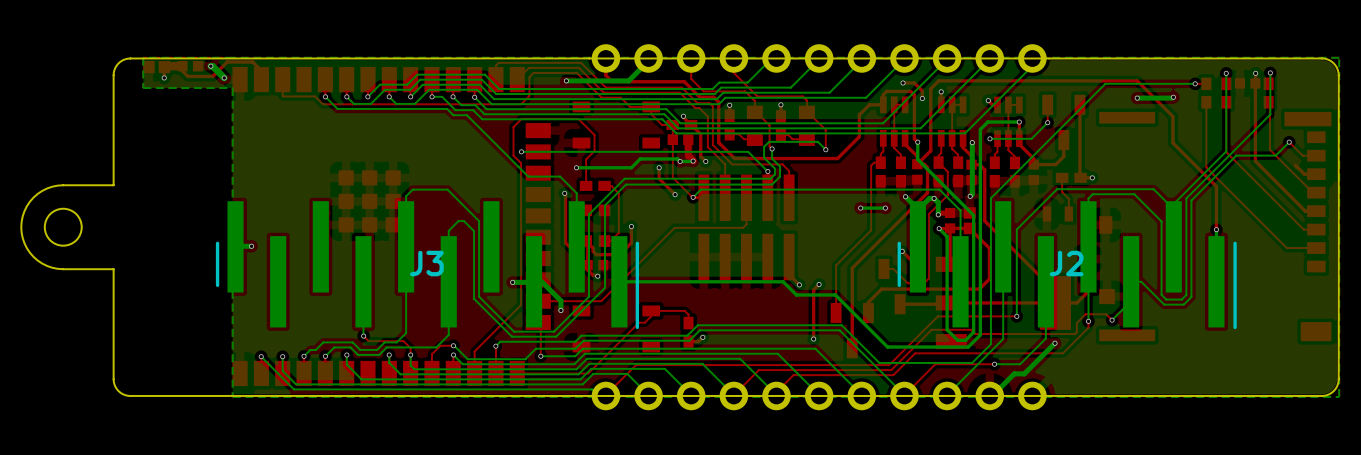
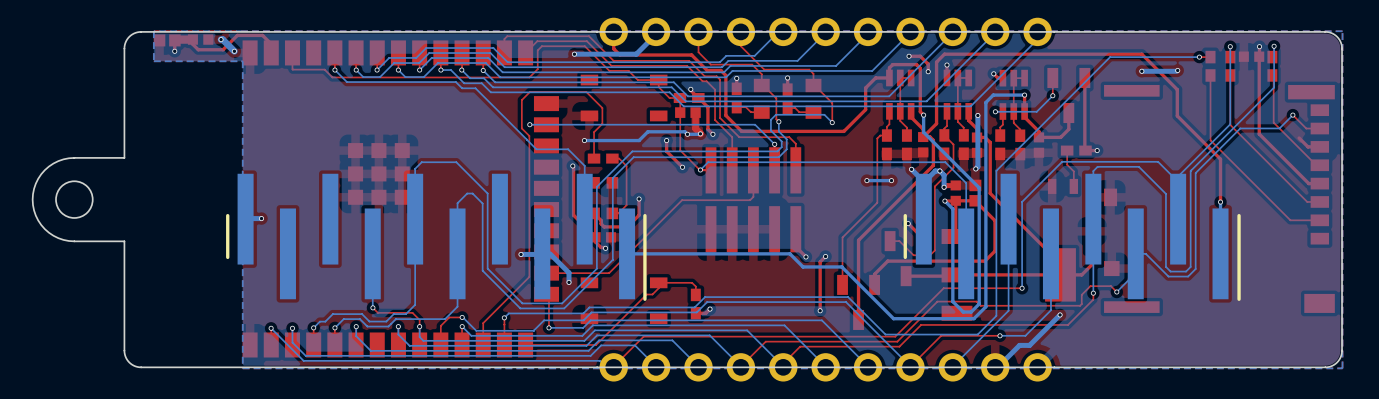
J3 name: J3 (426, 263) -> none
J2 name: J2 (1066, 263) -> none

